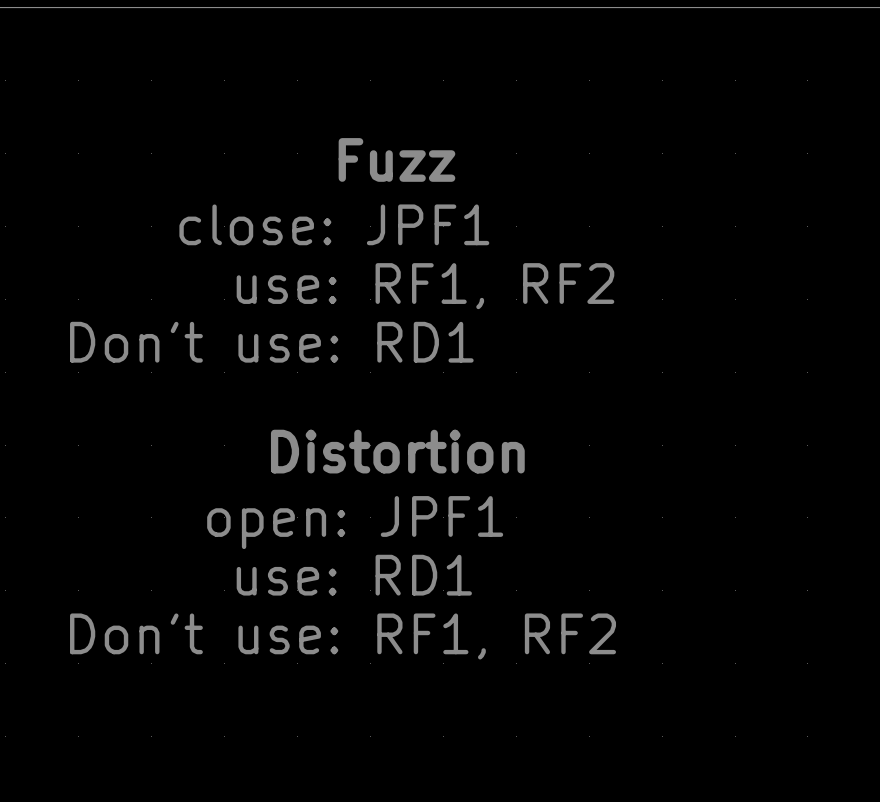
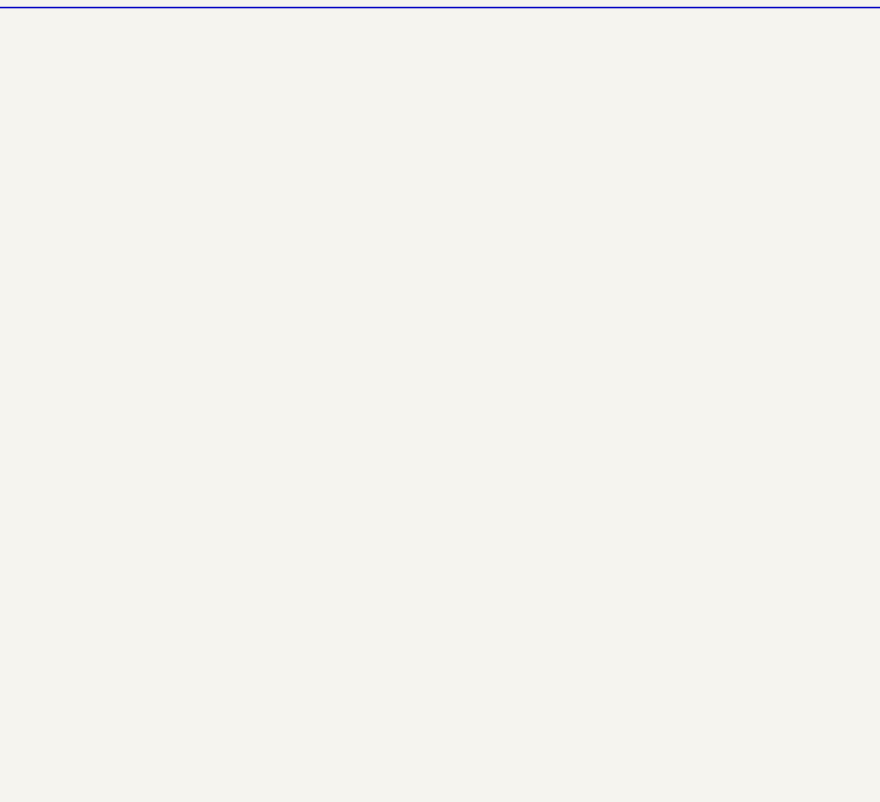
text: Fuzz (396, 159) -> none
text: close: JPF1 (334, 224) -> none
text: use: RF1, RF2 (425, 286) -> none
text: Don't use: RD1 (271, 342) -> none
text: Distortion (397, 451) -> none
text: open: JPF1 (355, 522) -> none
text: use: RD1 (354, 575) -> none
text: Don't use: RF1, RF2 (343, 636) -> none

